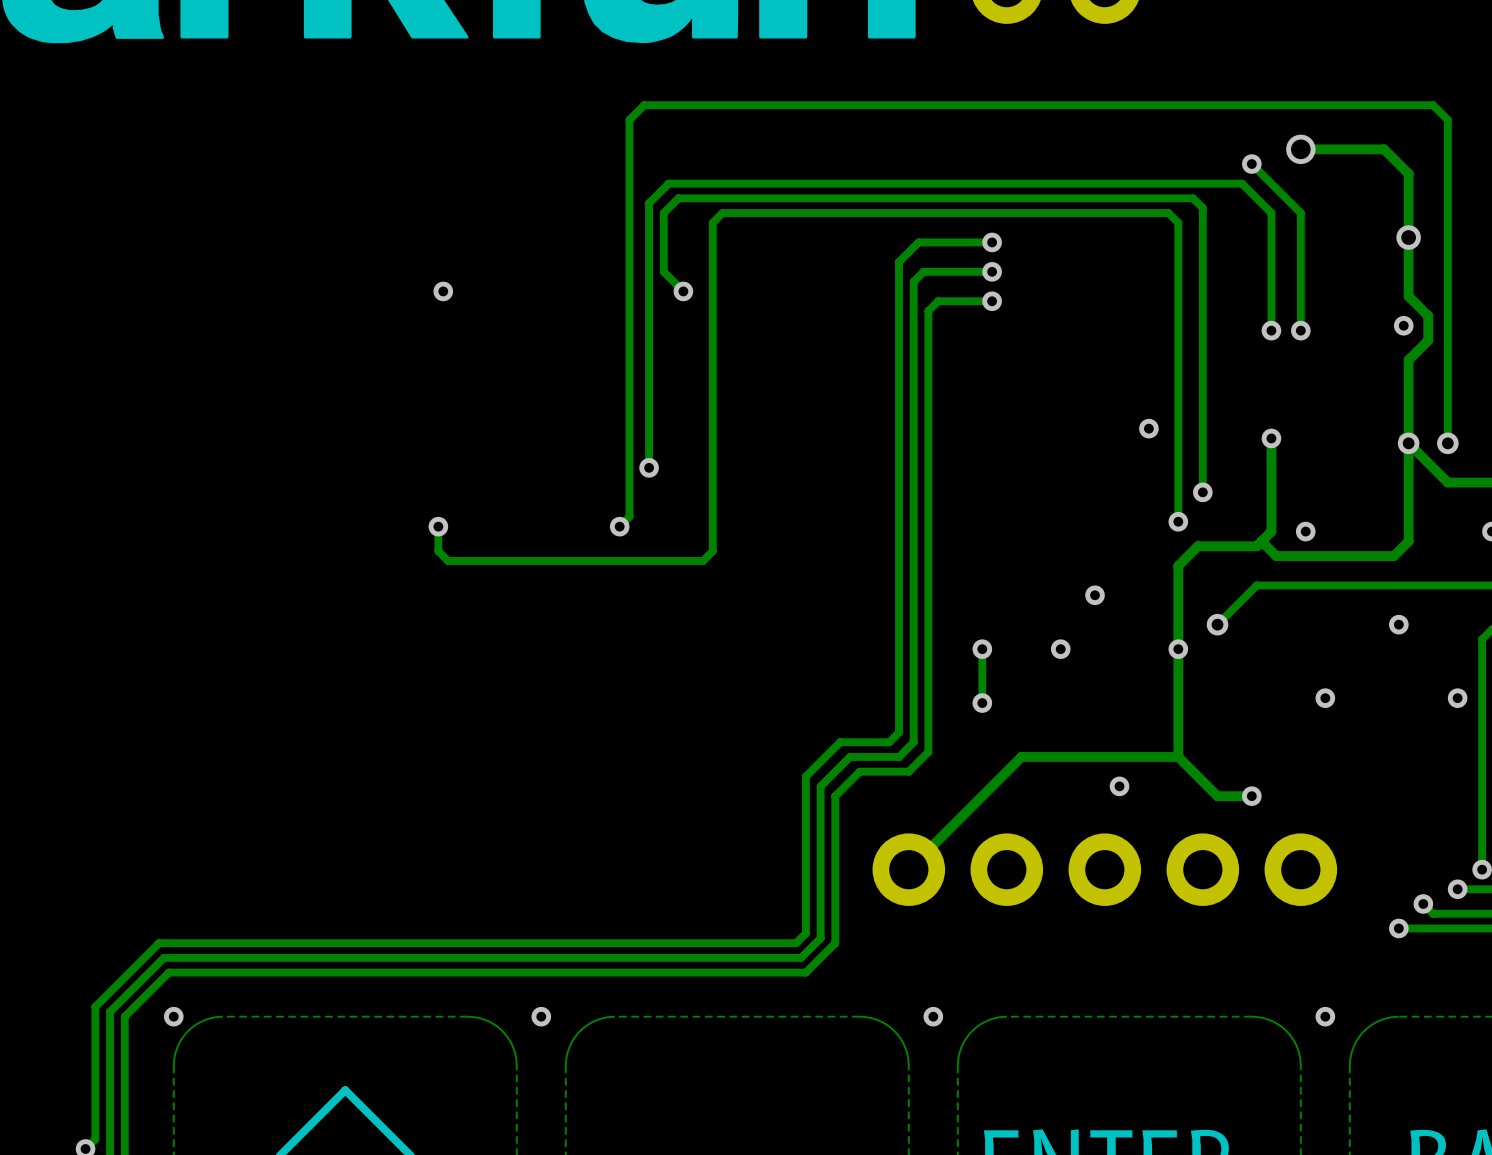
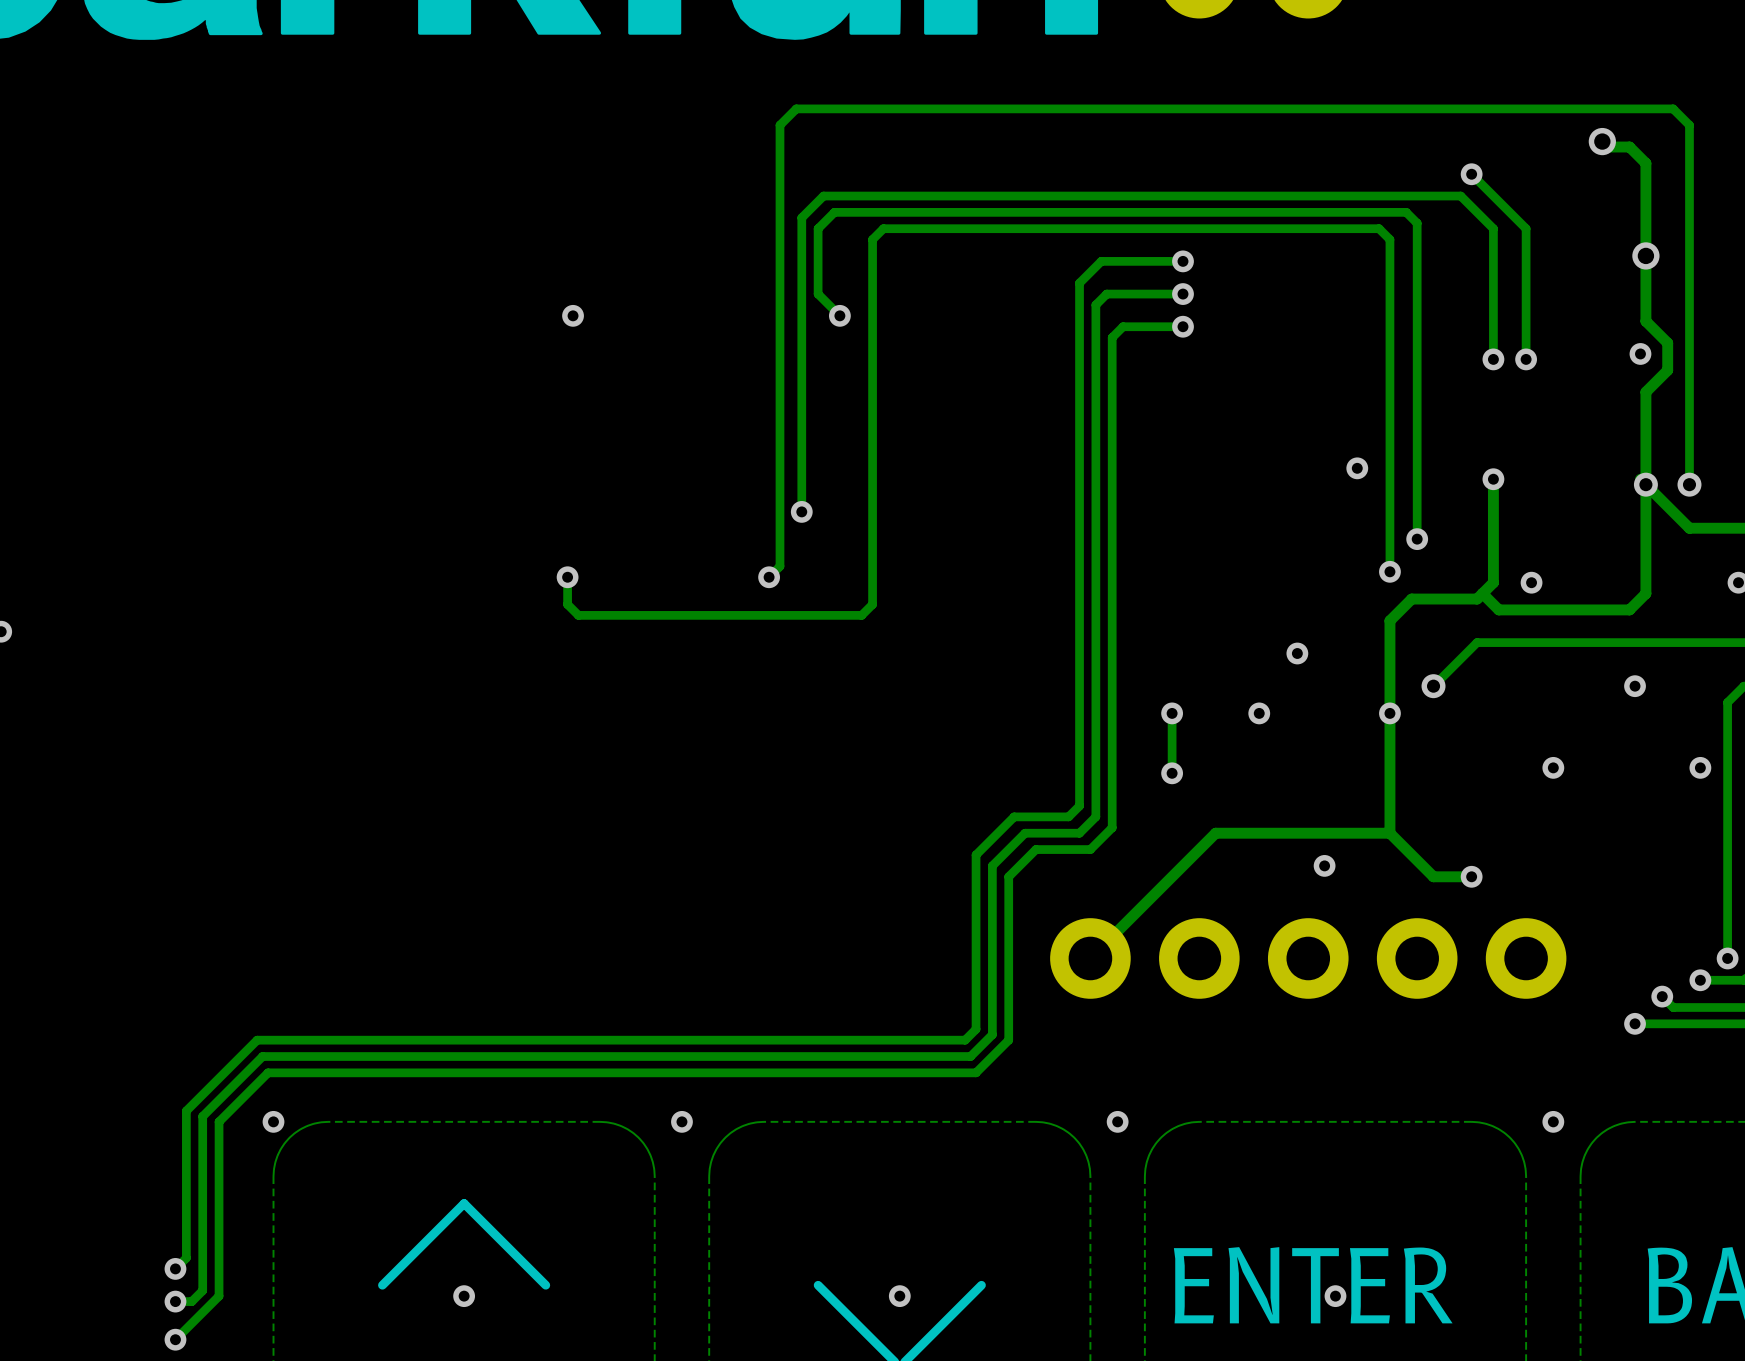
via: none -> (1602, 141)
track: (1300, 149) (1384, 149) (1408, 173) -> (1602, 141) (1607, 147) (1629, 147) (1645, 163) (1645, 185)
via: (1300, 149) -> none

